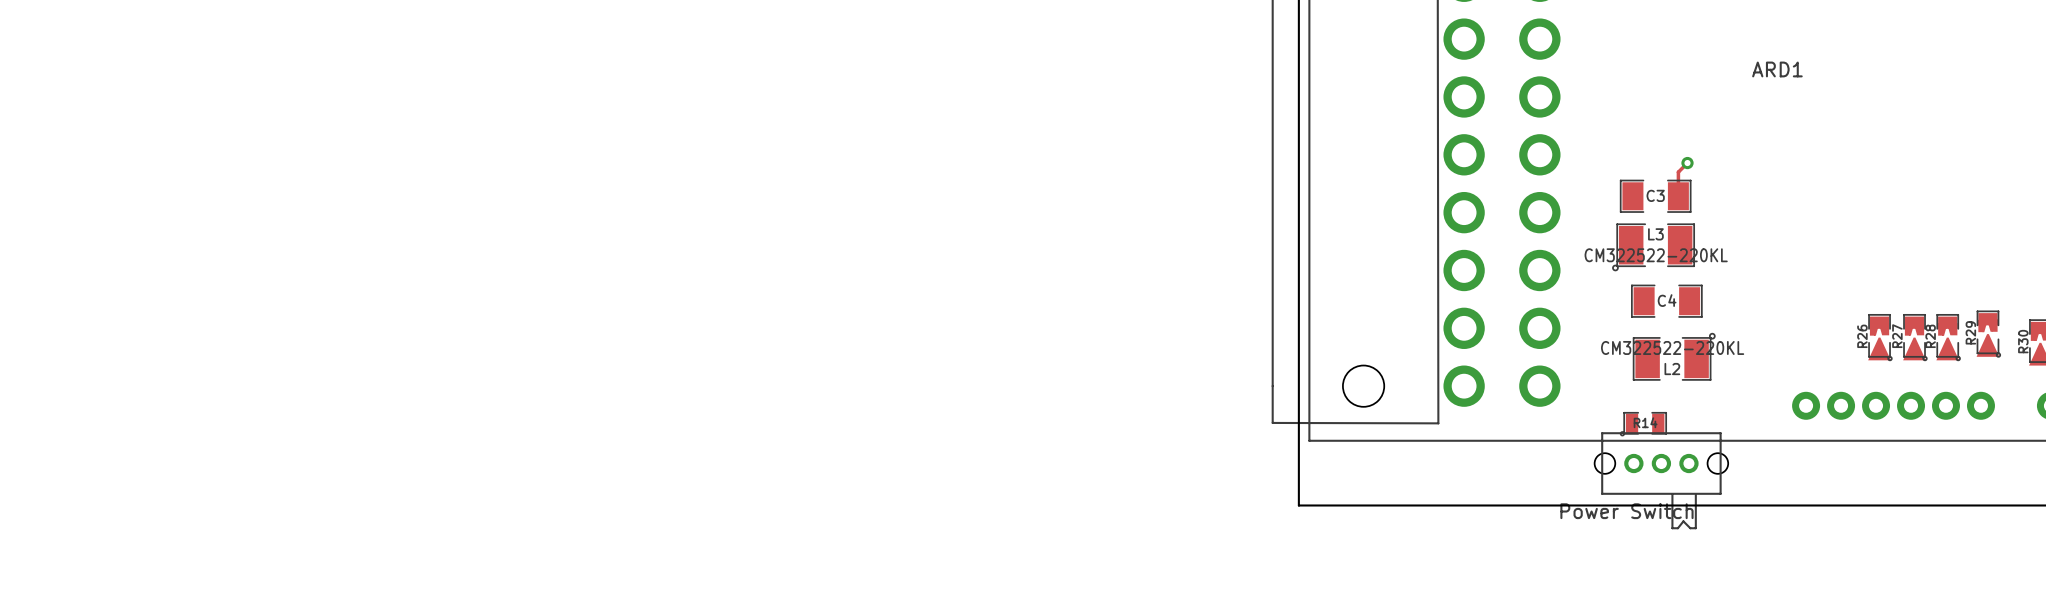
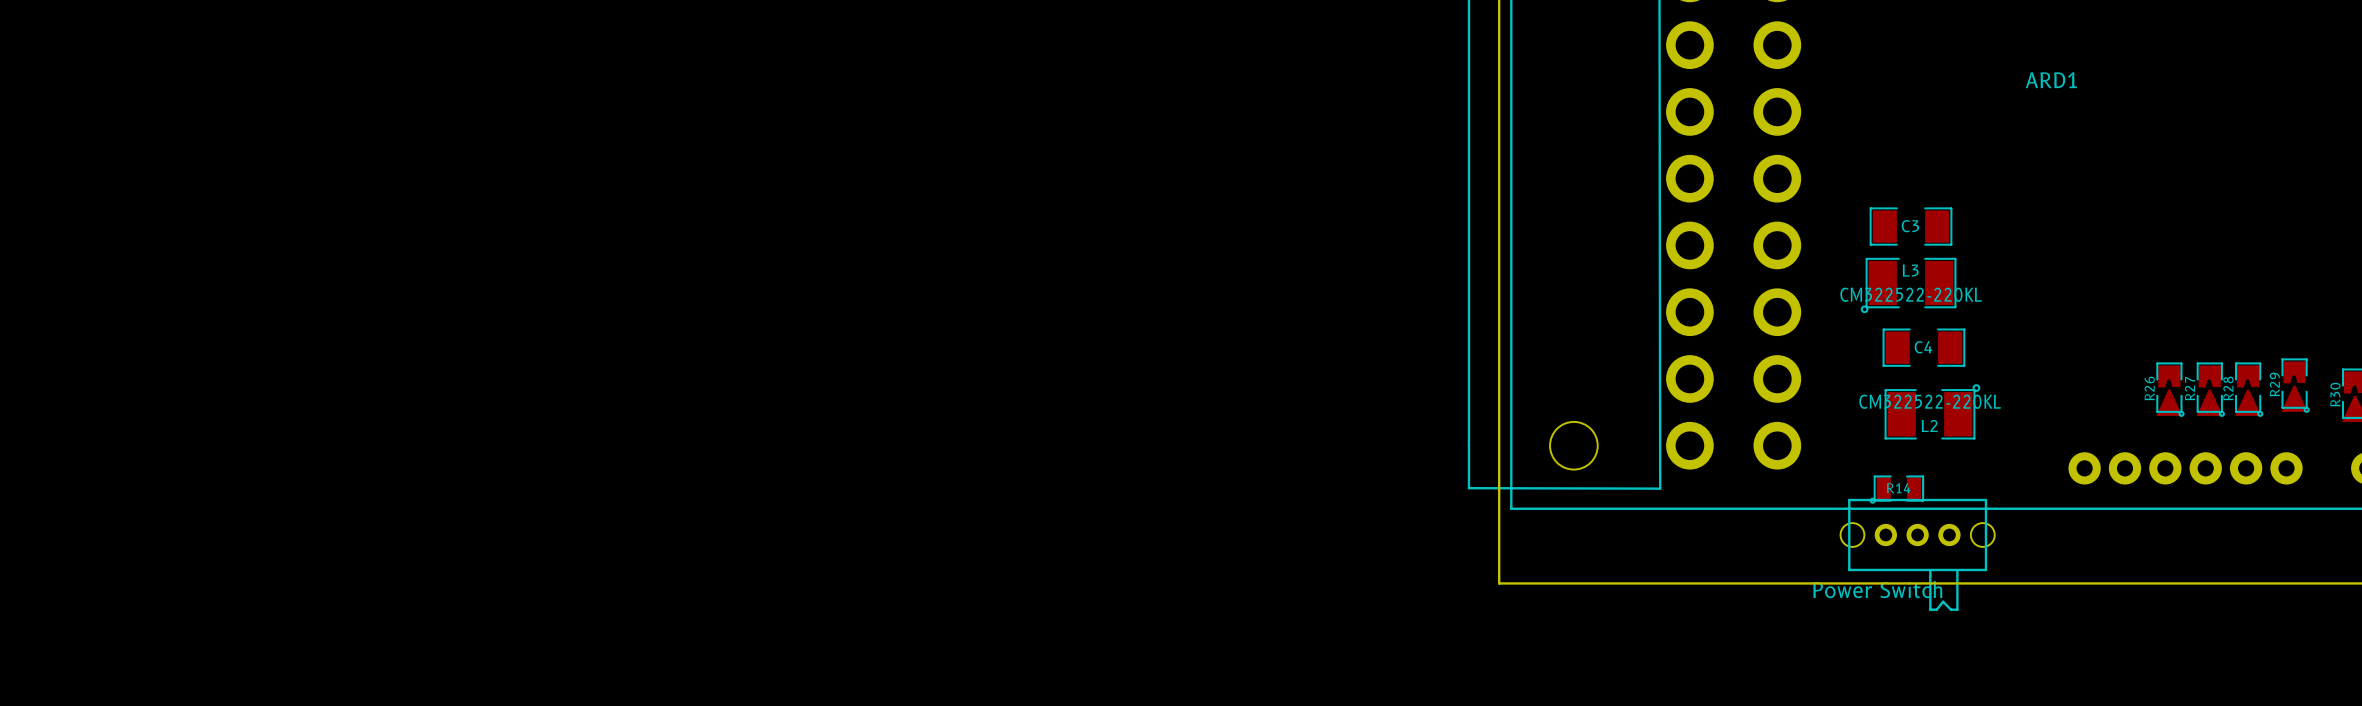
track: (1687, 163) (1678, 172) (1678, 196) -> none
via: (1687, 163) -> none

